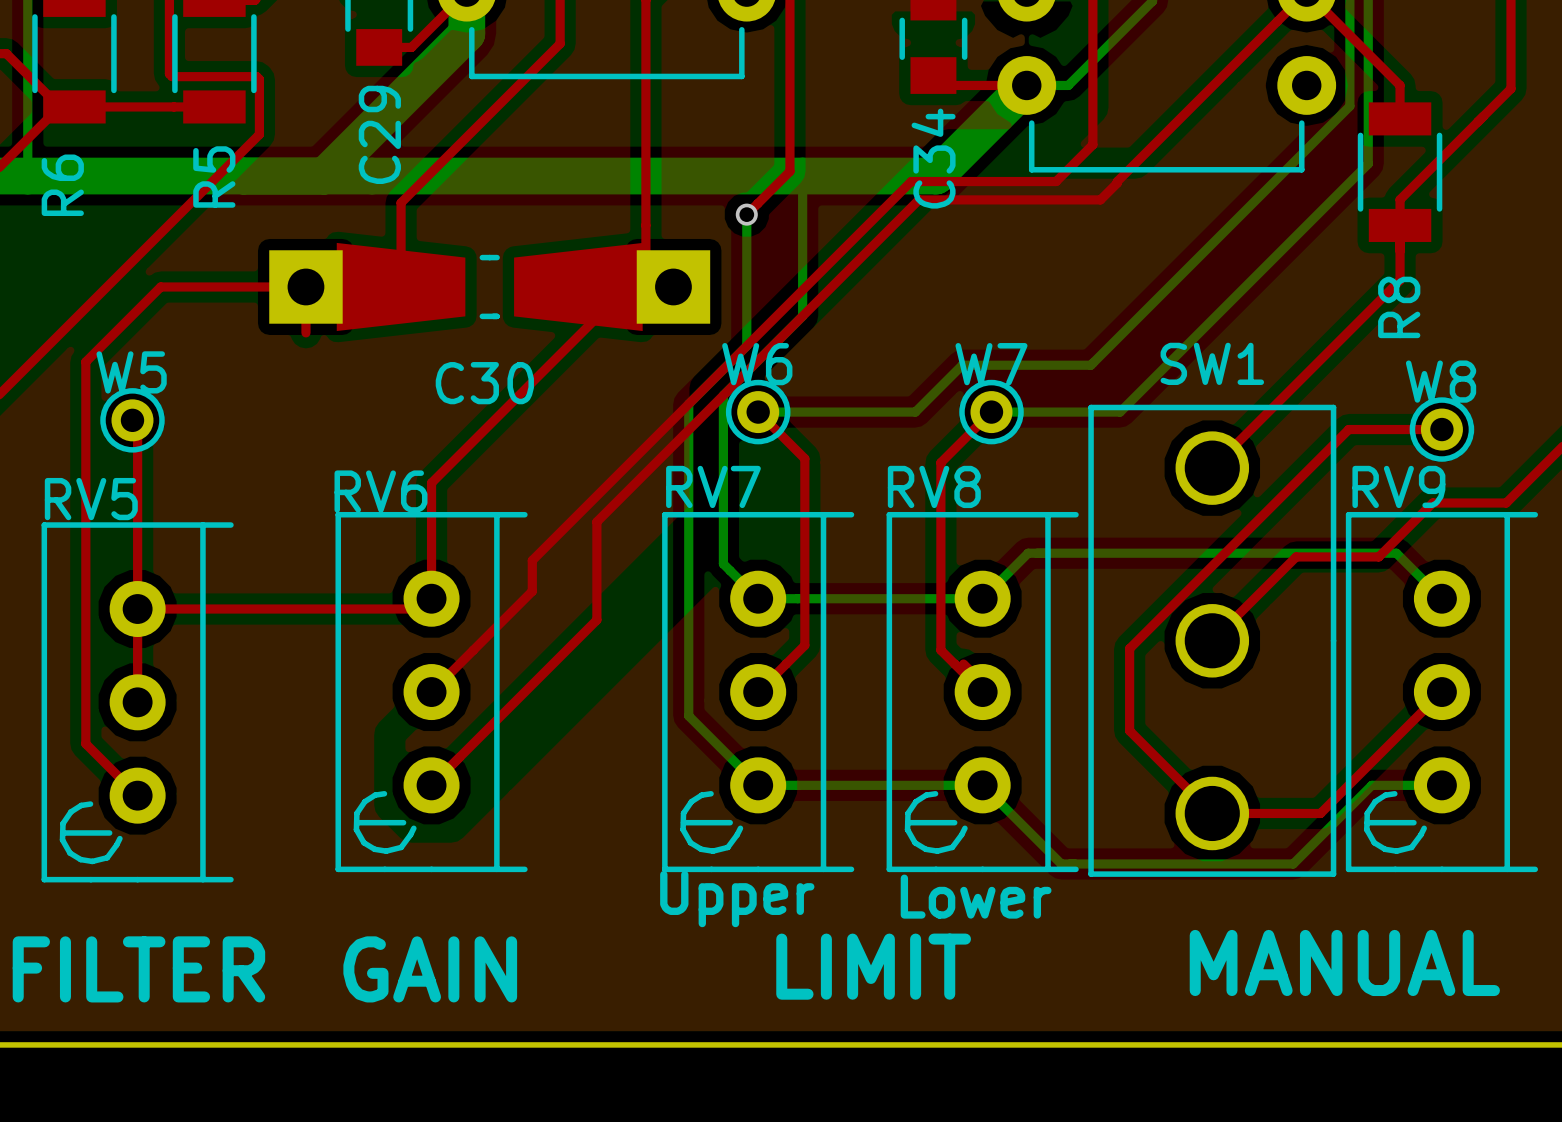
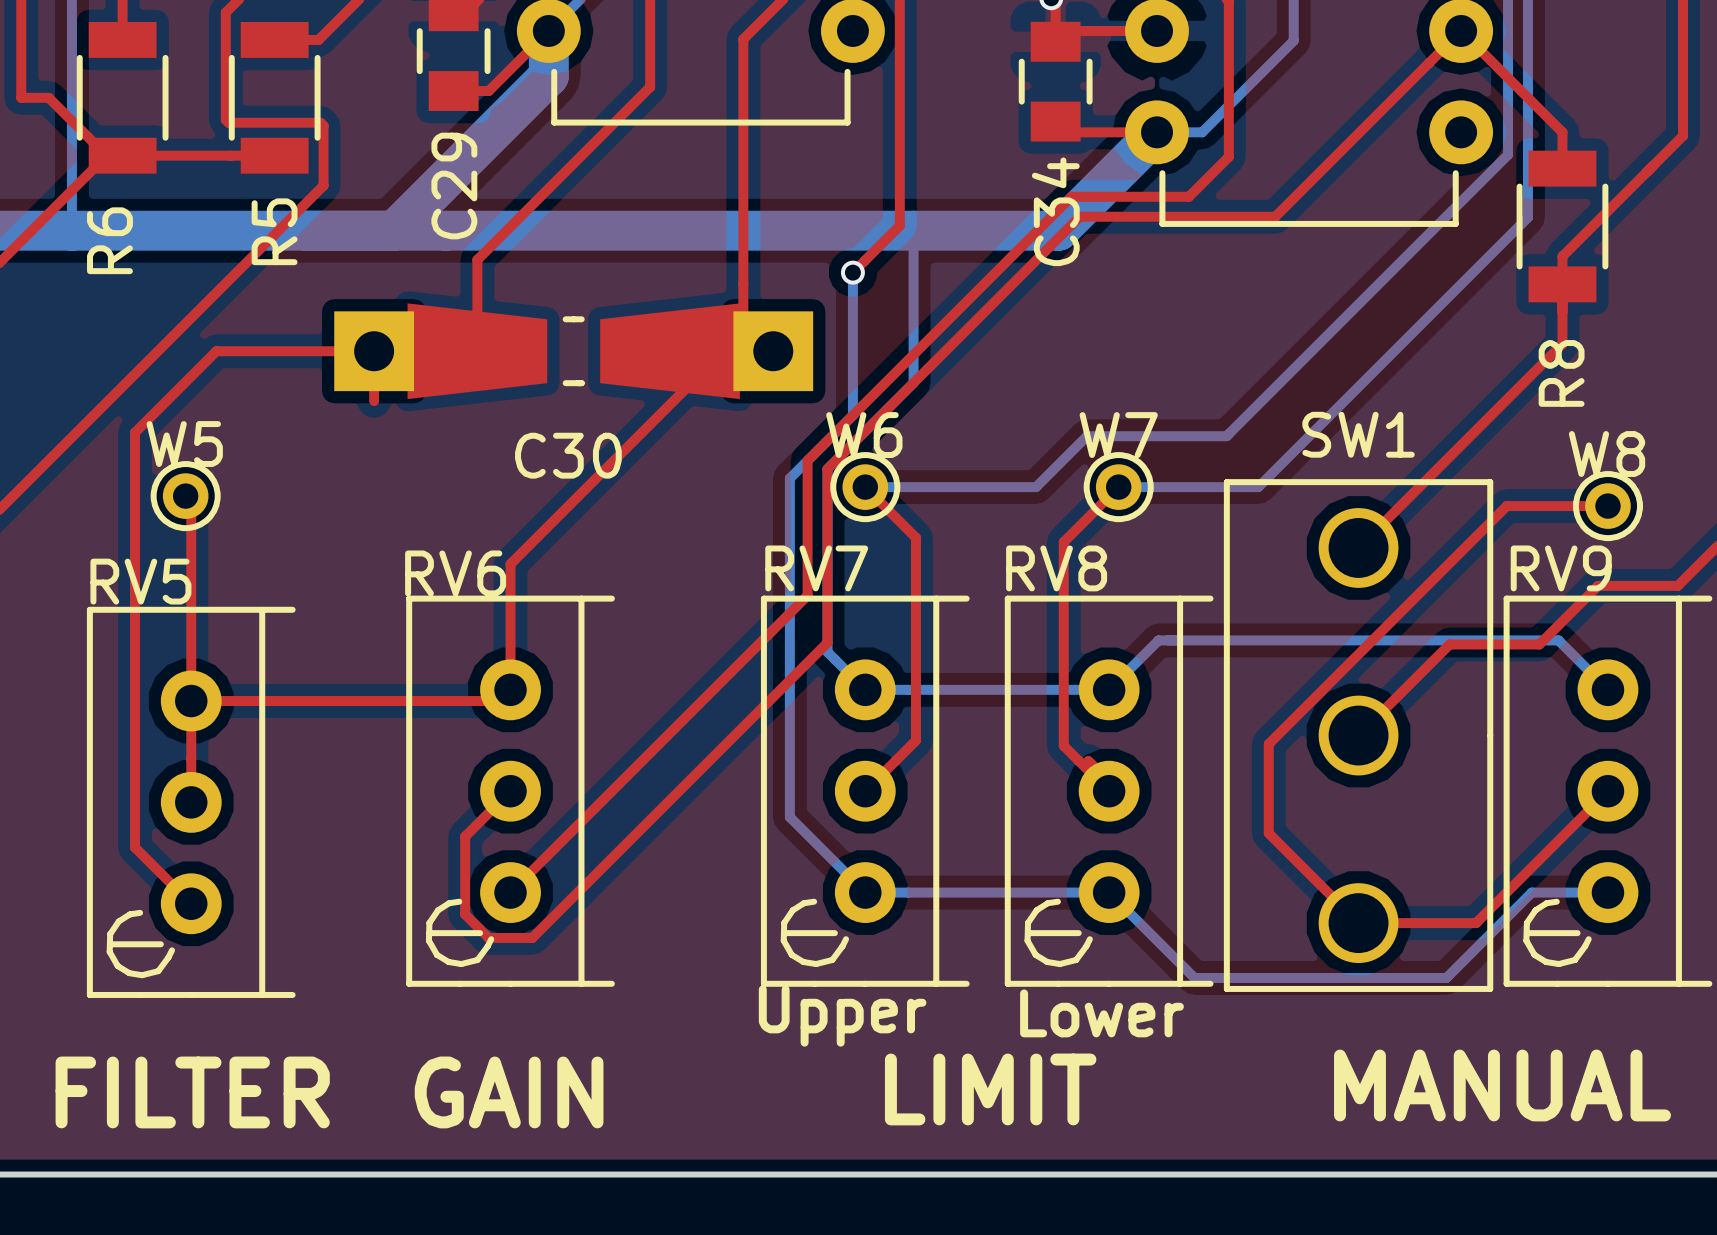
top track: (1092, 108) (1092, 144) (1056, 181) (911, 181) -> (1228, 156) (1188, 196) (1071, 196) (1031, 236)
top track: (1135, 163) (1100, 199) (918, 199) -> (1275, 216) (1079, 216) (1039, 256)
top track: (705, 387) (532, 560) (532, 591) (431, 692) -> (827, 468) (827, 642) (532, 937) (488, 937) (465, 914) (465, 836) (510, 791)
top track: (723, 395) (596, 521) (596, 620) -> (807, 460) (807, 595) (690, 712)

